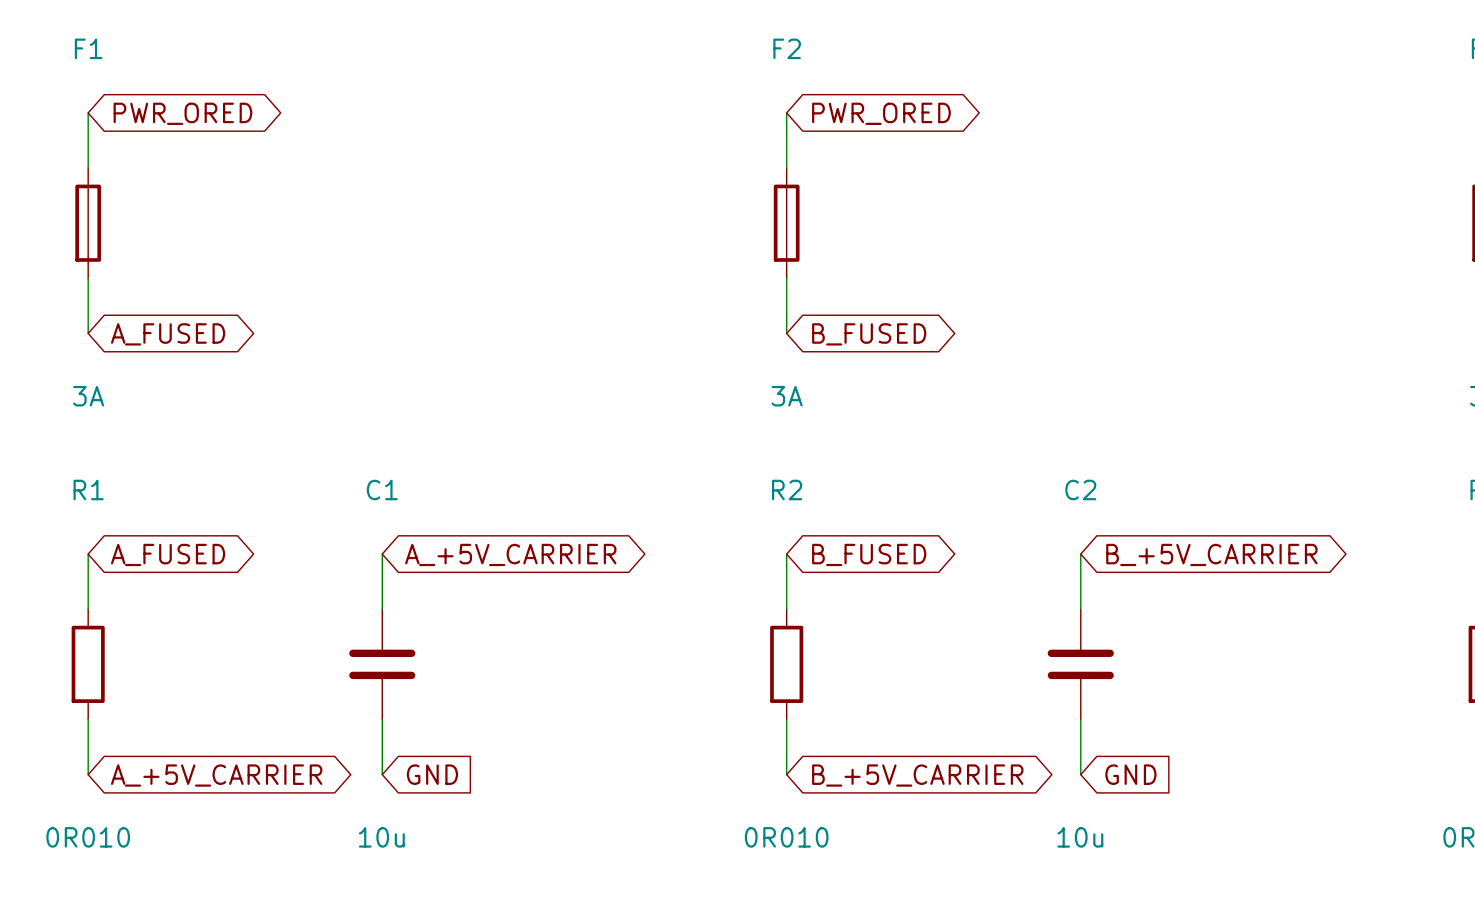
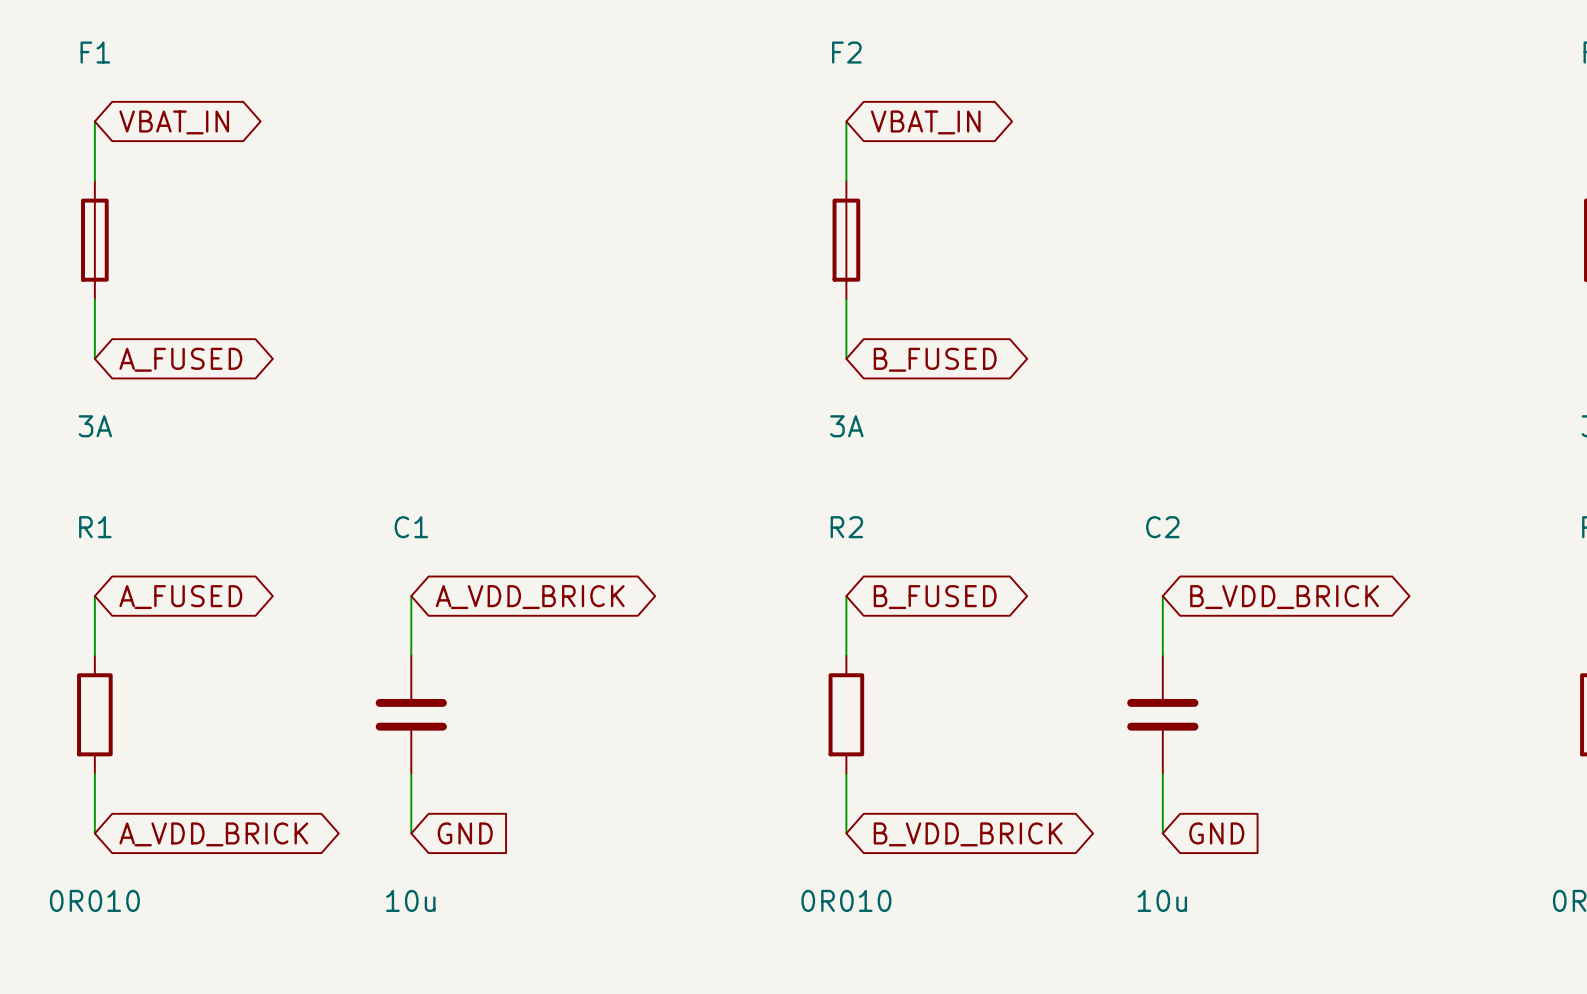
global label: PWR_ORED (182, 113) -> VBAT_IN (174, 122)
global label: PWR_ORED (881, 113) -> VBAT_IN (925, 122)
global label: A_+5V_CARRIER (510, 554) -> A_VDD_BRICK (530, 597)
global label: B_+5V_CARRIER (1211, 554) -> B_VDD_BRICK (1284, 597)
global label: A_+5V_CARRIER (216, 775) -> A_VDD_BRICK (213, 834)
global label: B_+5V_CARRIER (917, 775) -> B_VDD_BRICK (968, 834)

